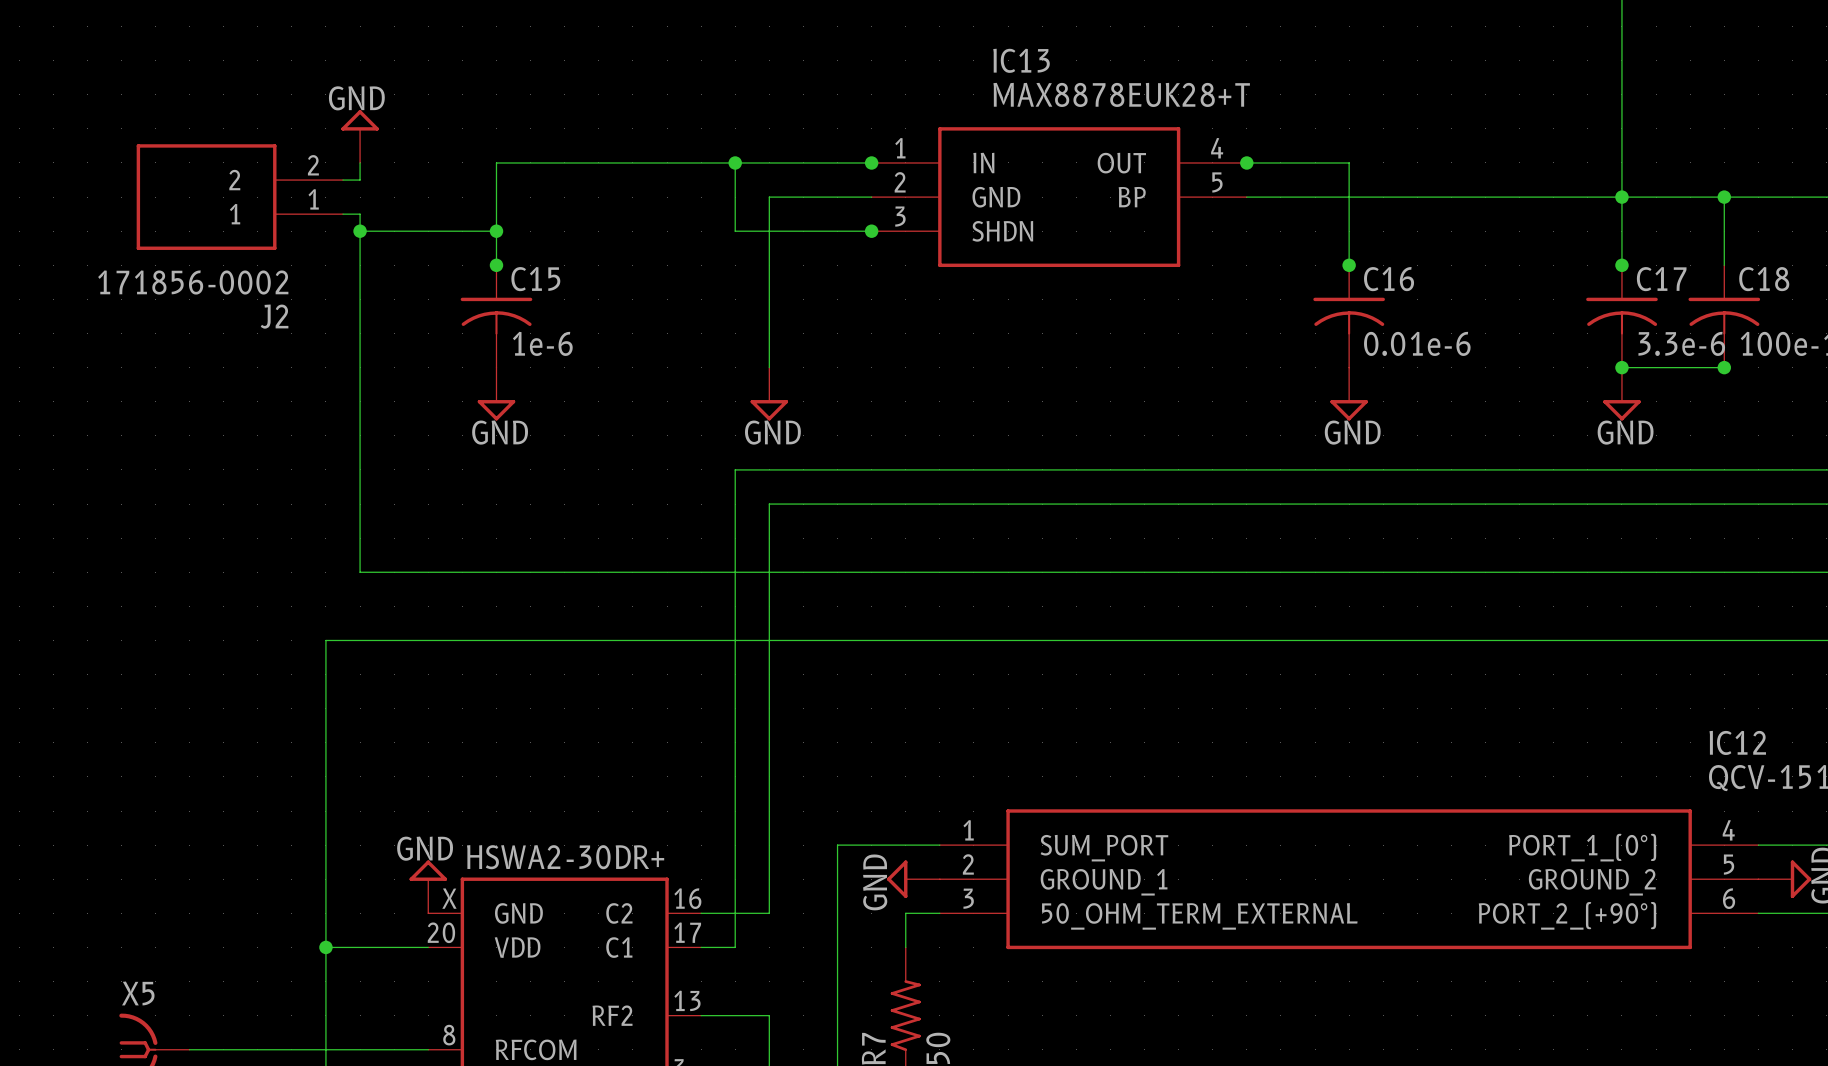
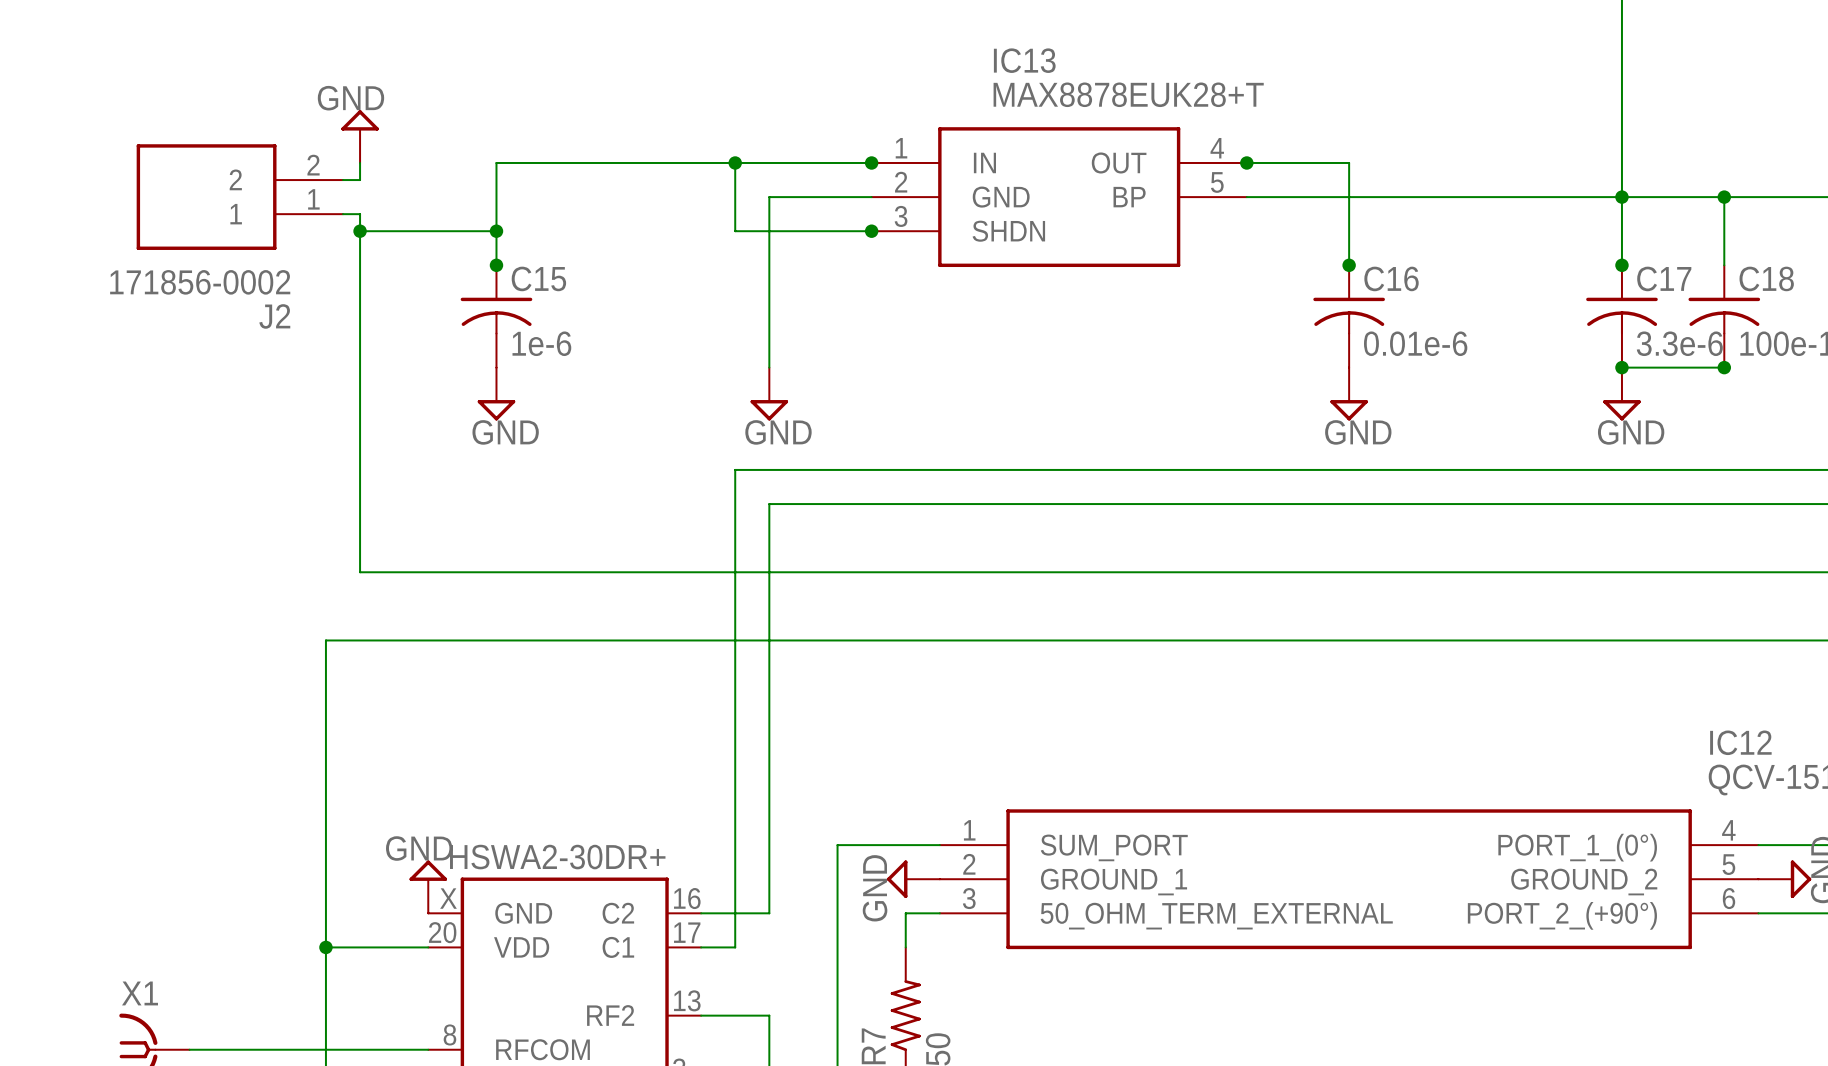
X5 name: X5 (138, 993) -> X1 (140, 993)

